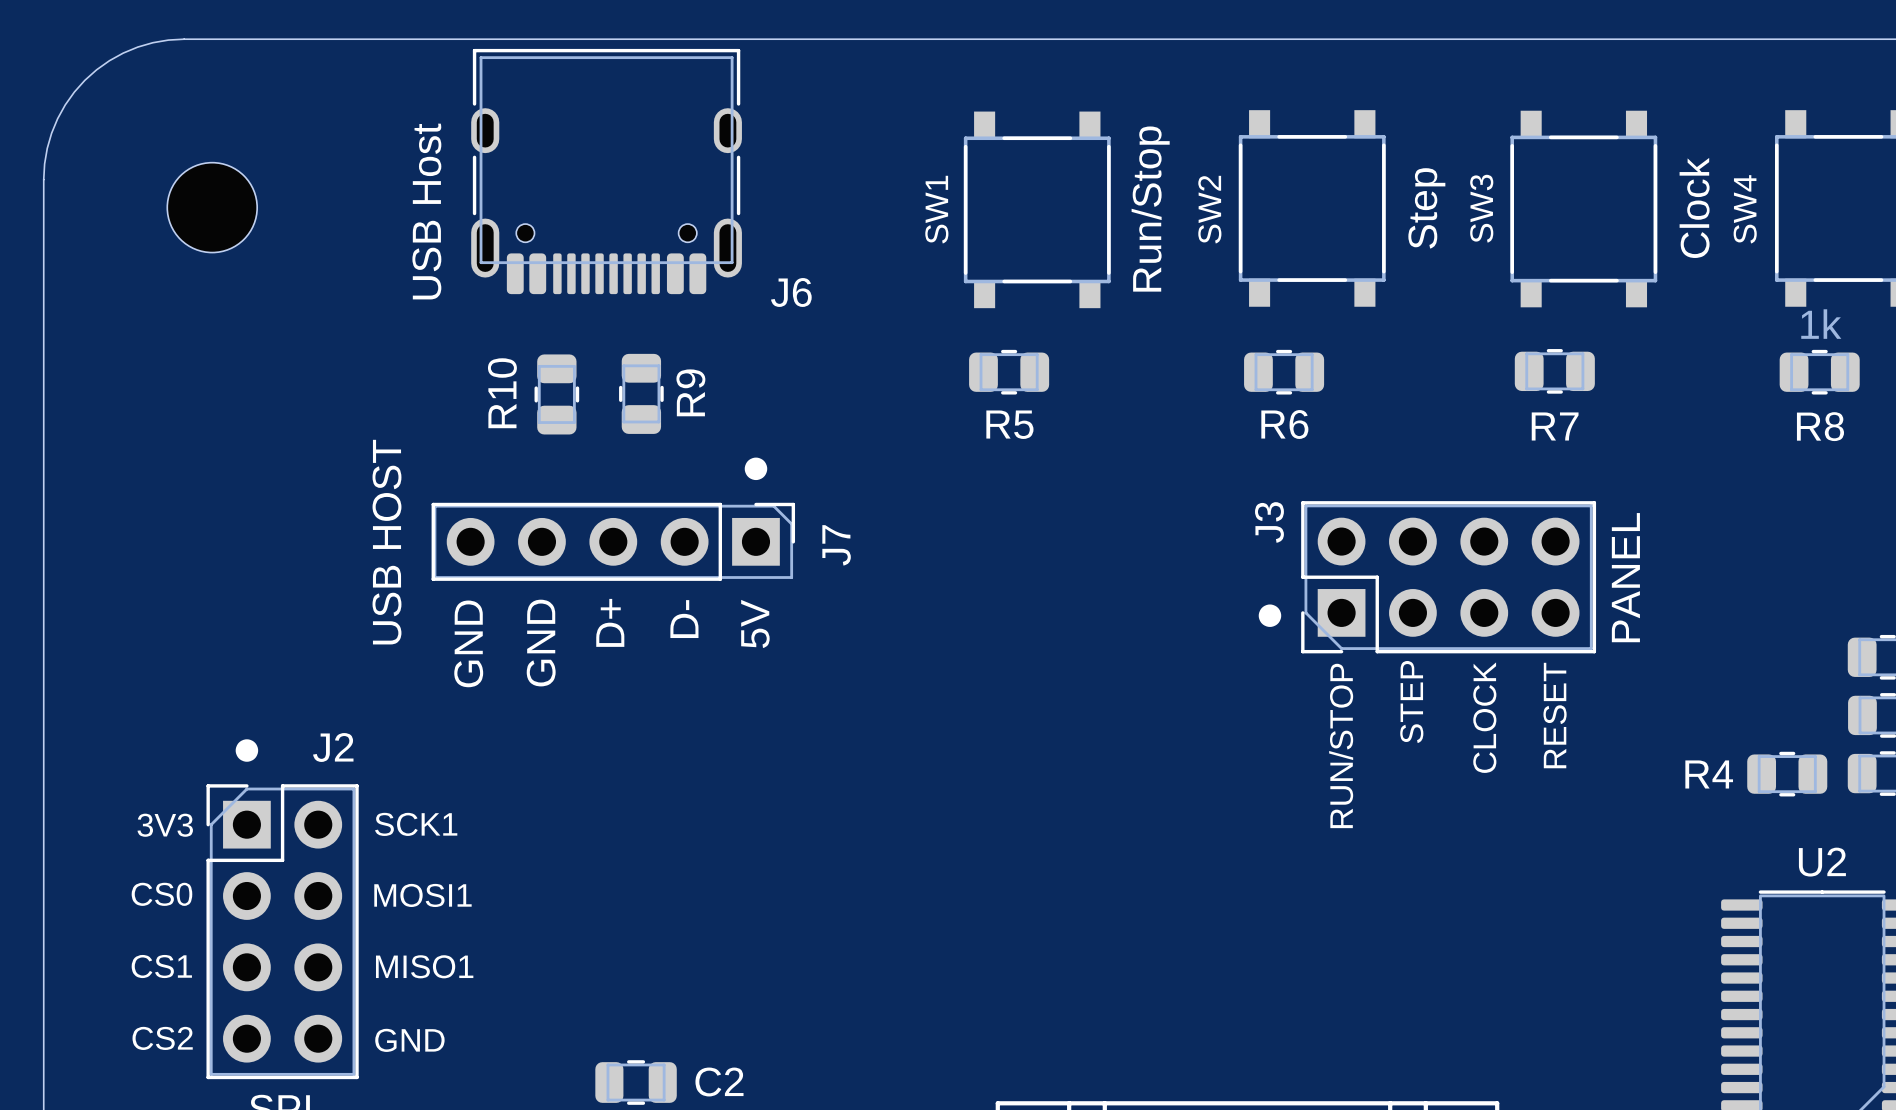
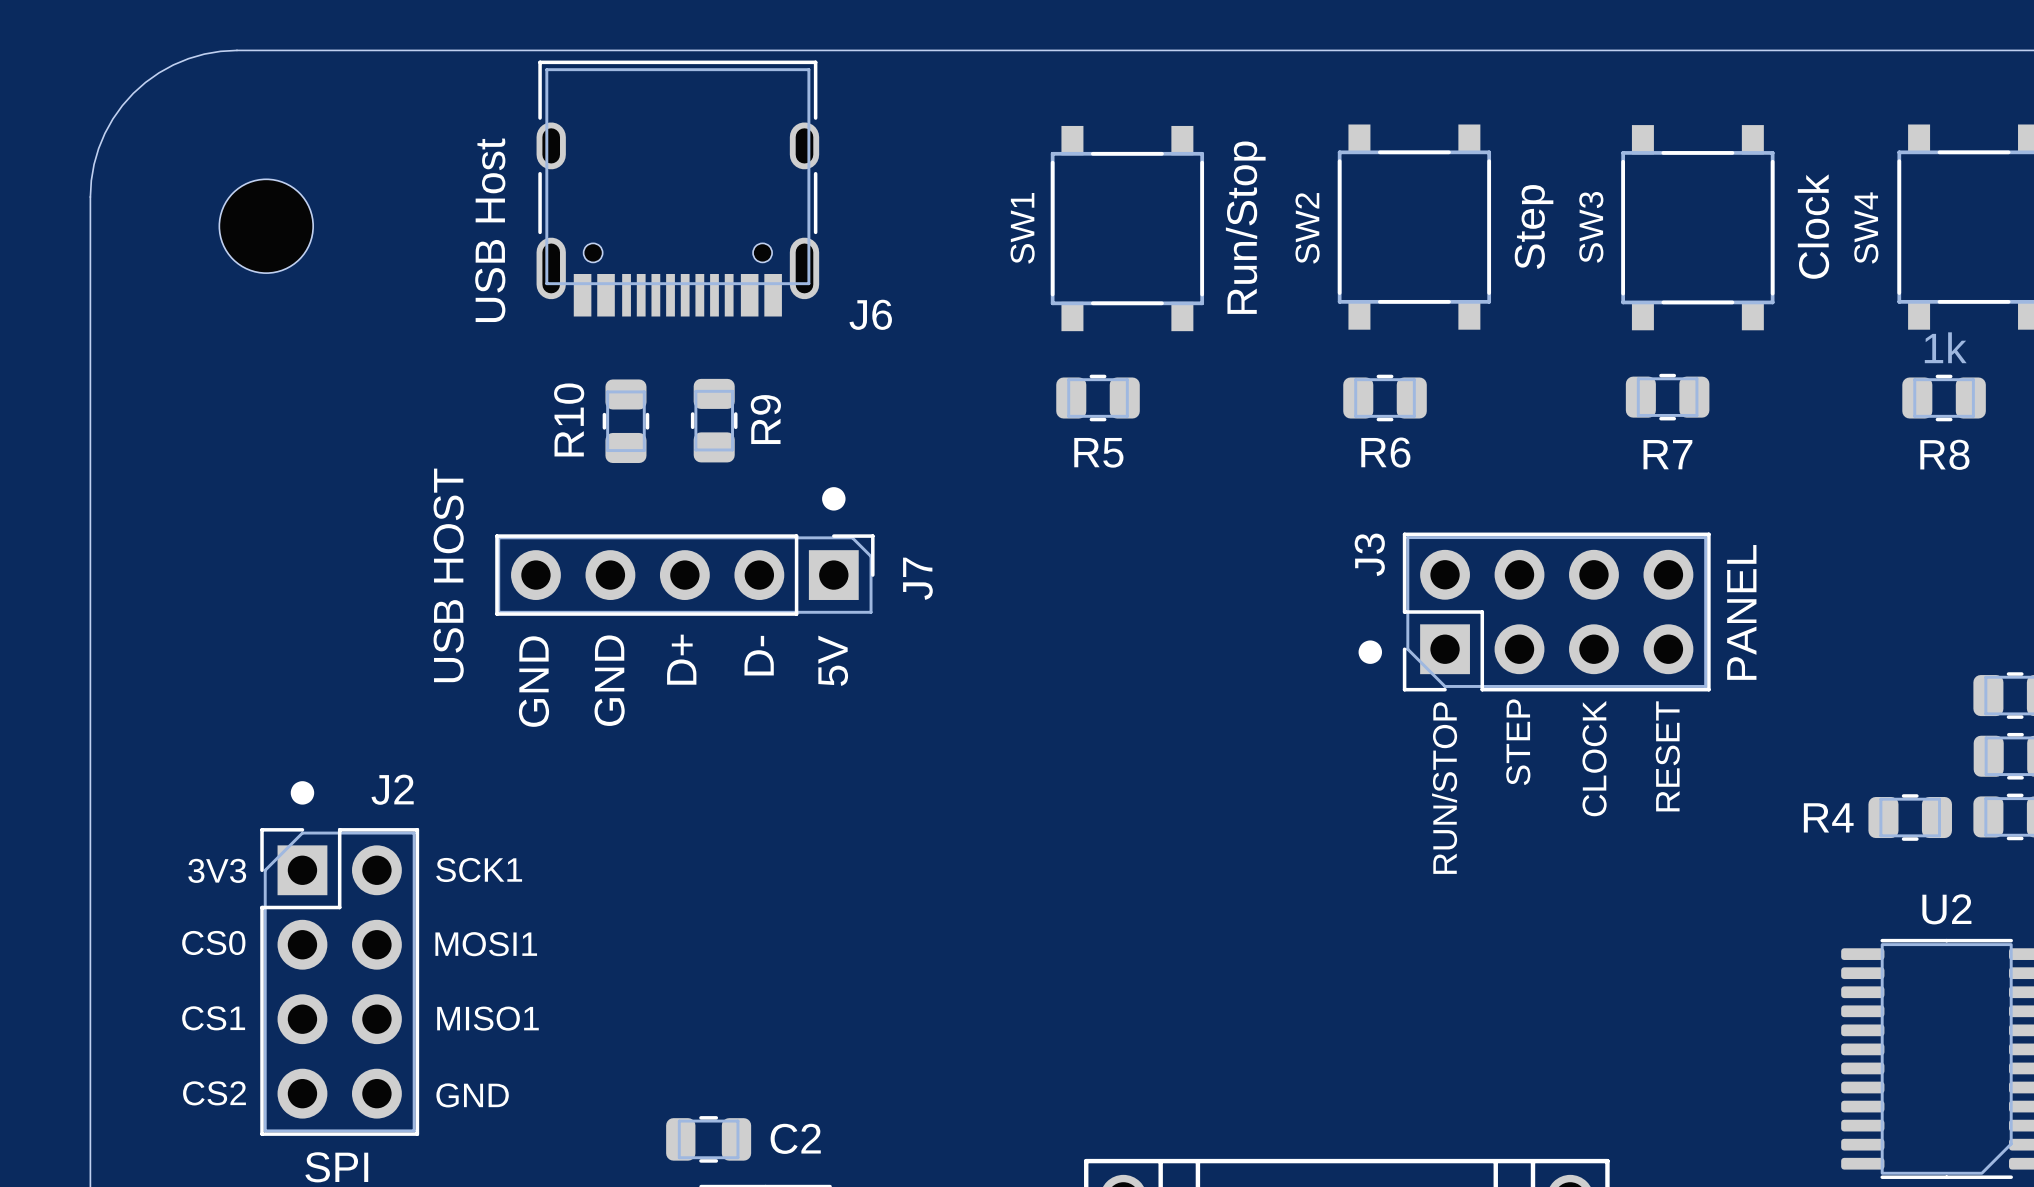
J6 footprint: [471, 48, 742, 295] -> [536, 60, 820, 317]

